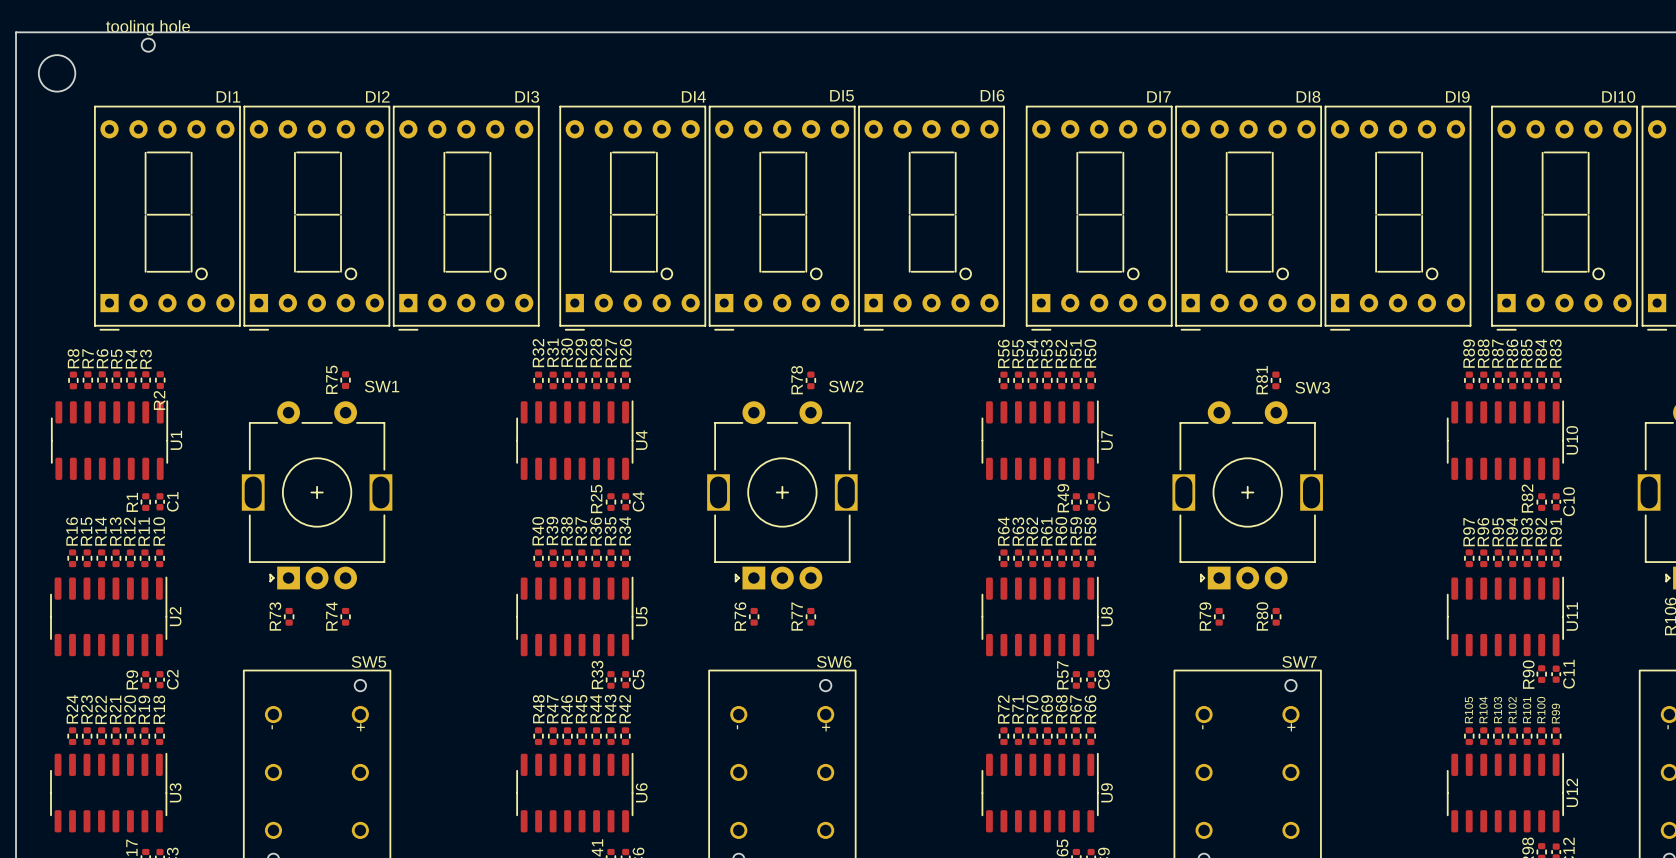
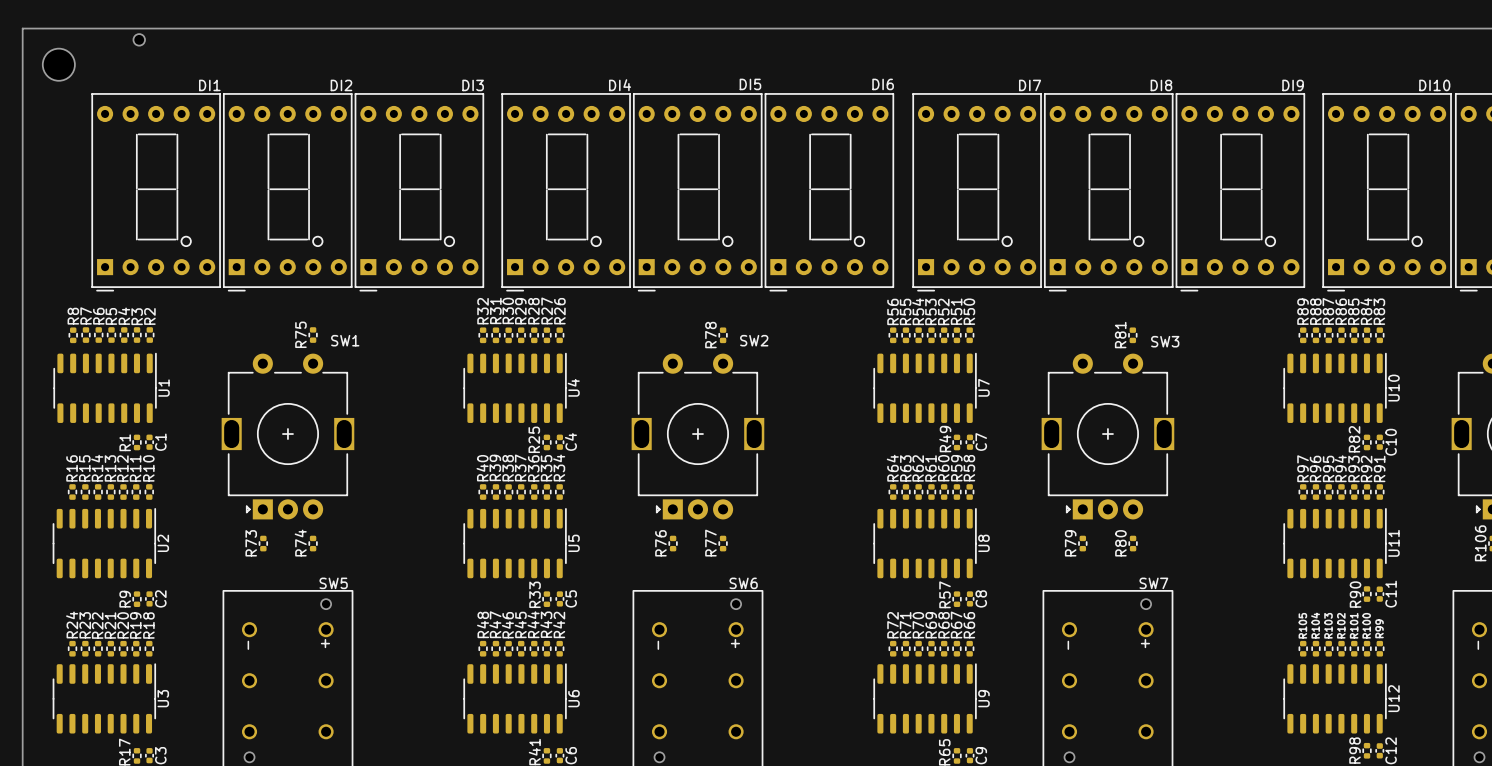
part text: tooling hole (148, 27) -> none
R2 name position: R2 (159, 400) -> R2 (149, 316)

